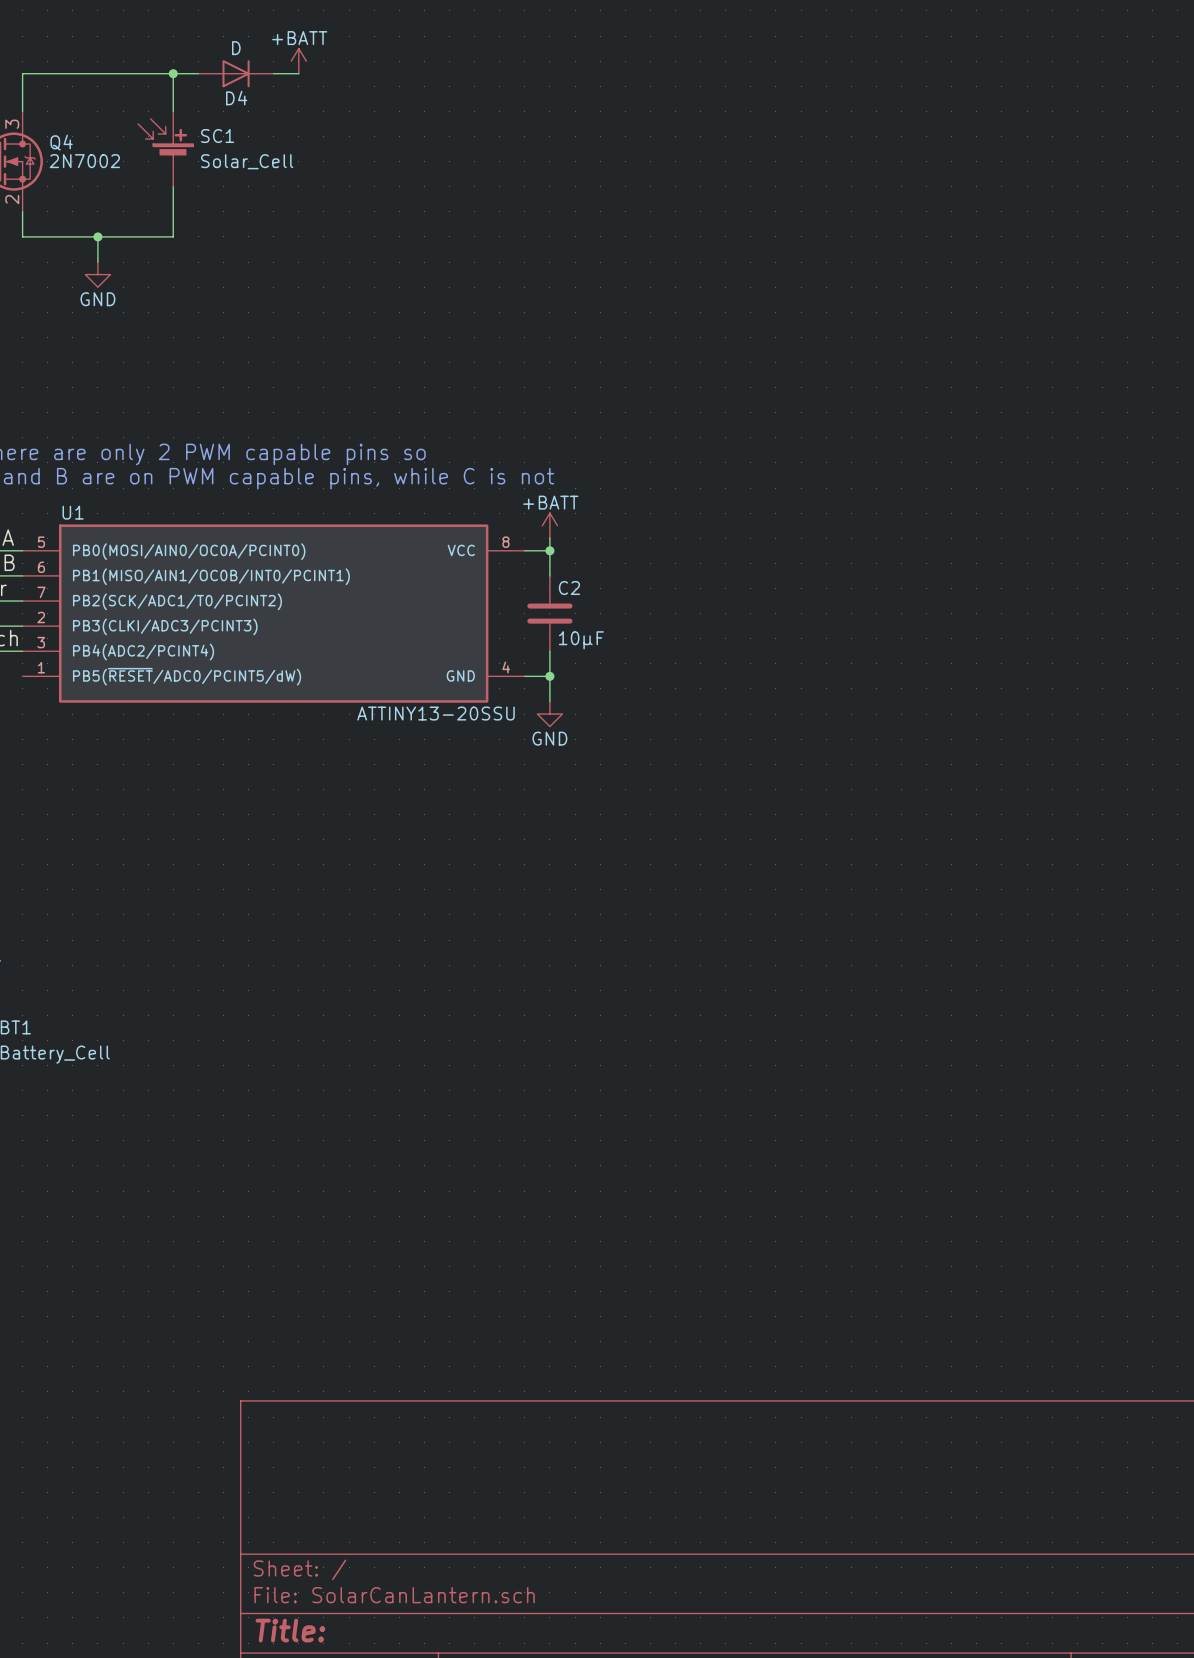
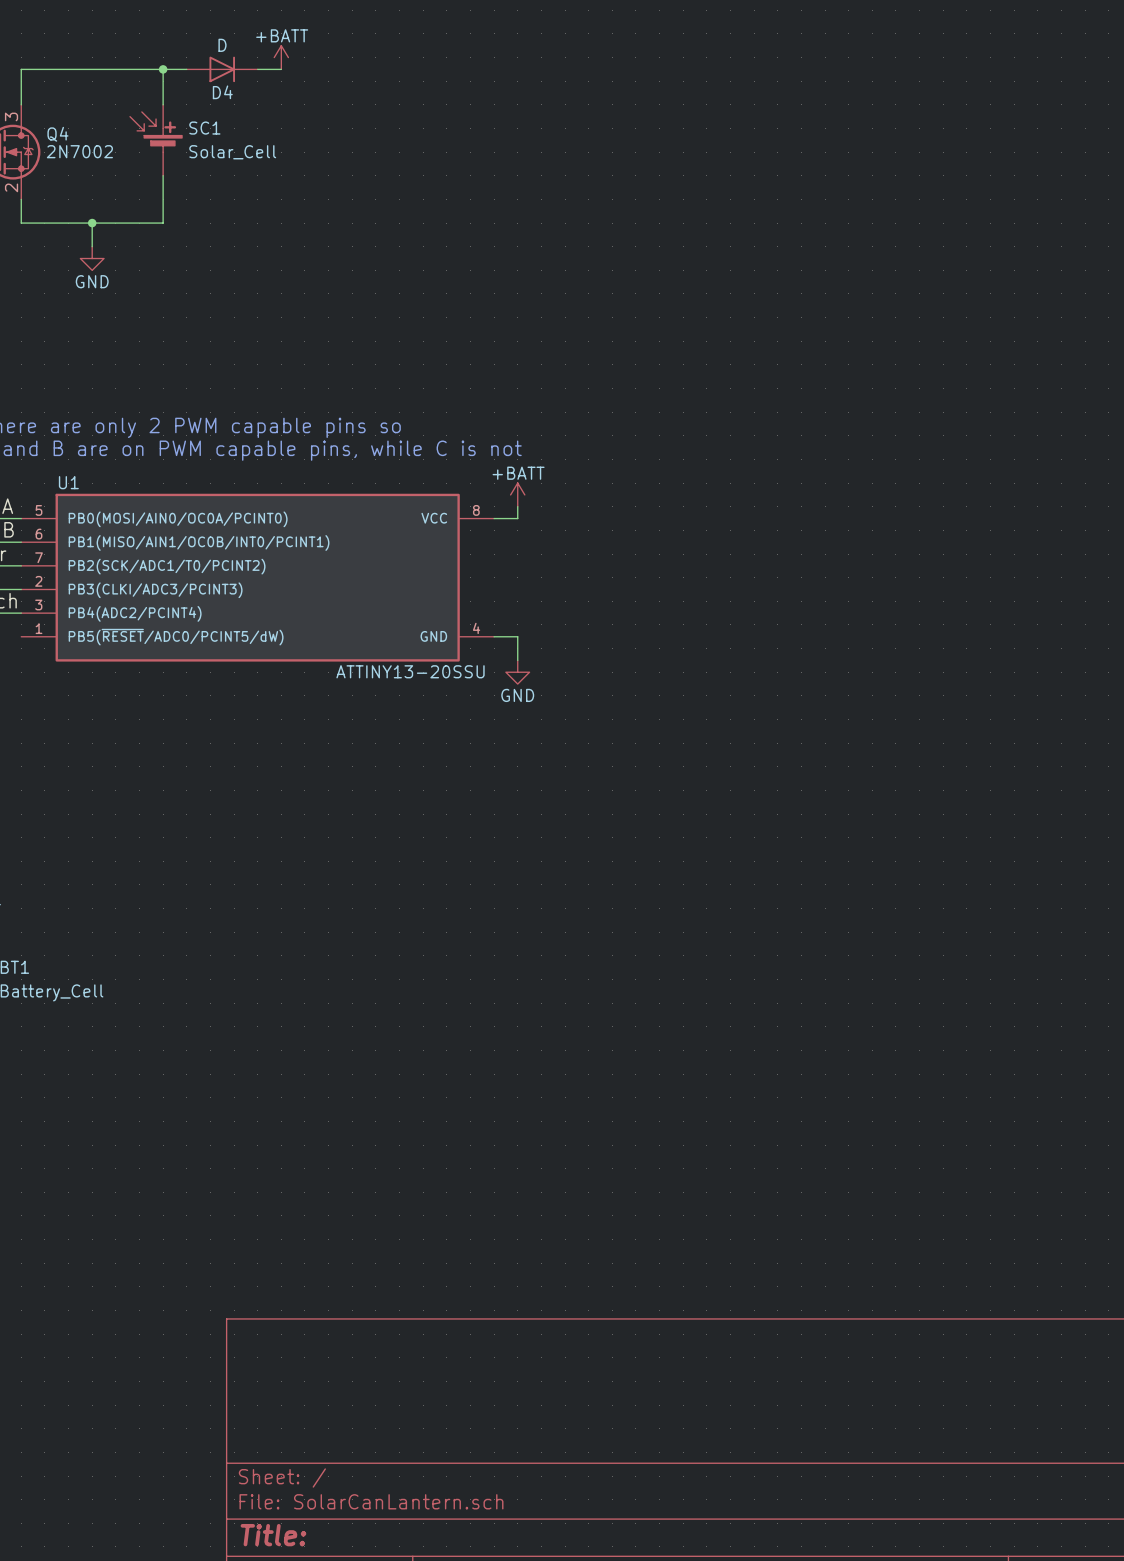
wire: (549, 550) (549, 575) -> none
junction: (549, 550) -> none
C2: 10µF (549, 613) -> none
wire: (549, 651) (549, 676) -> none
junction: (549, 676) -> none

